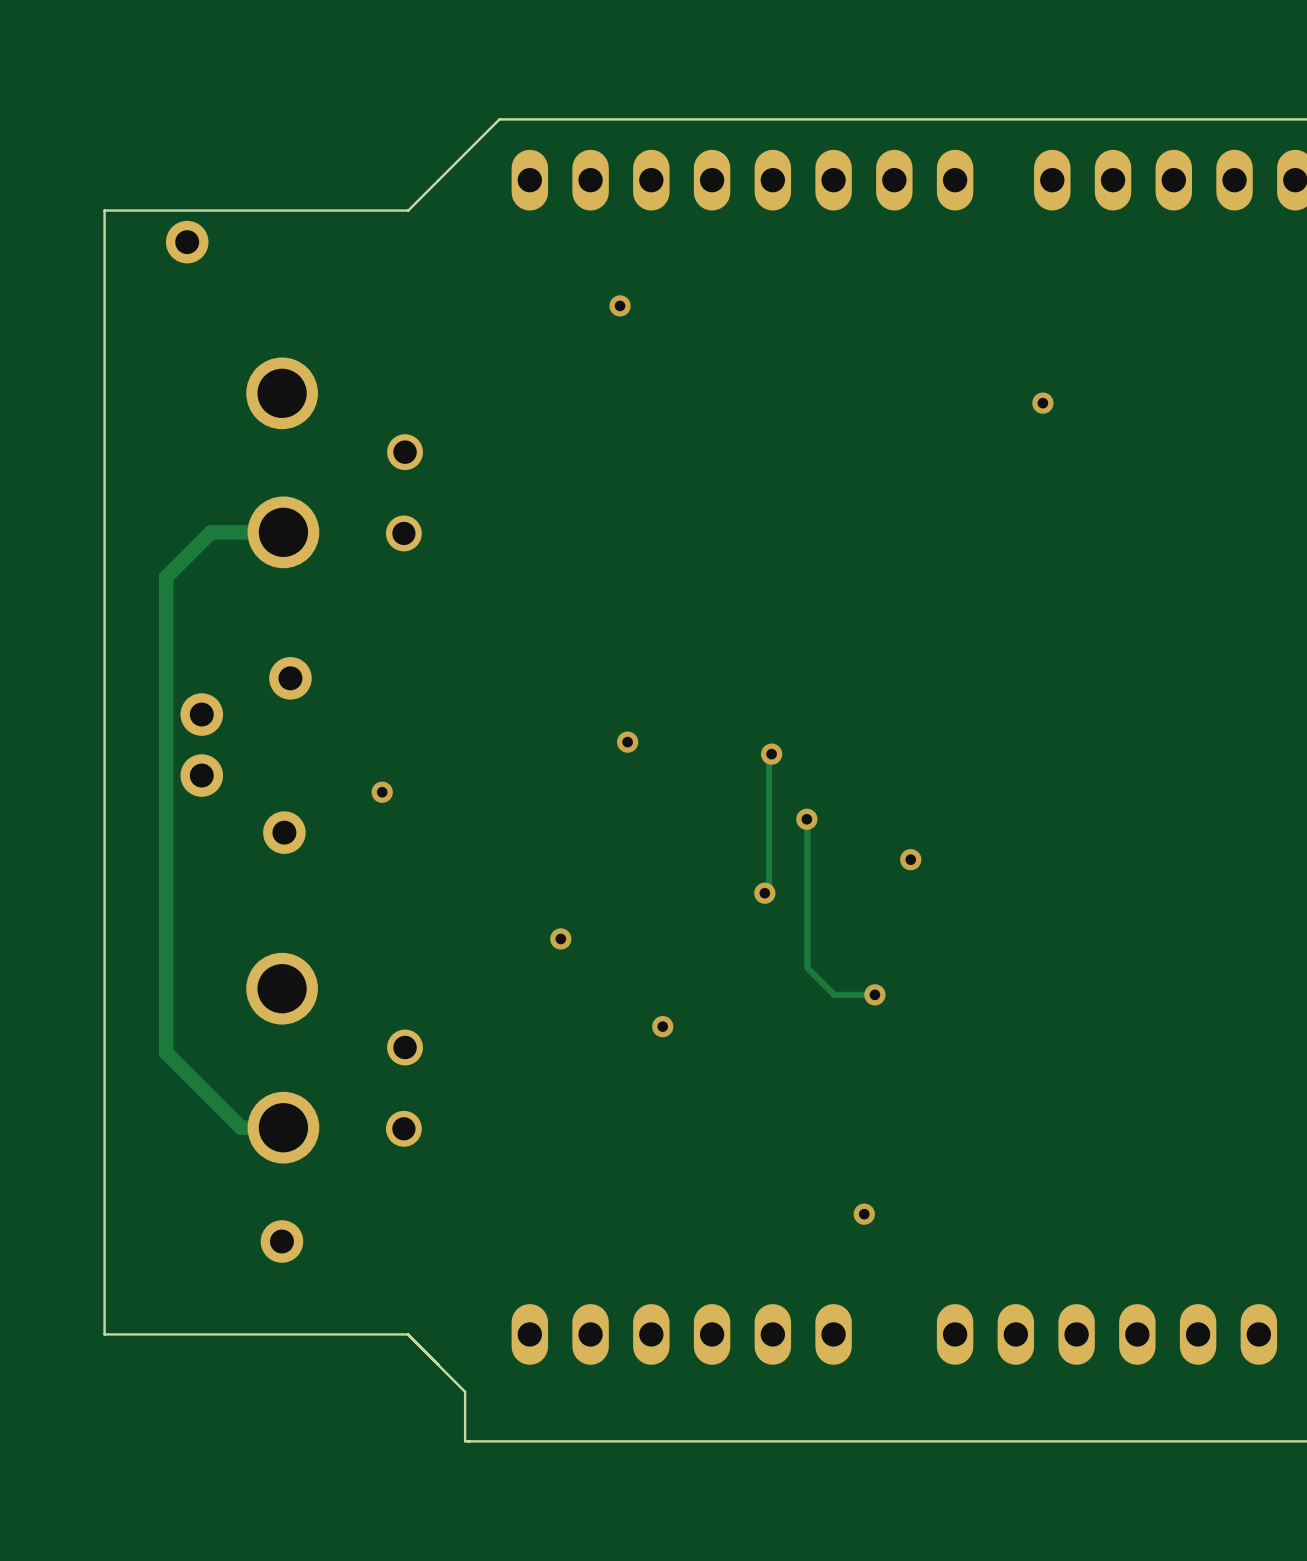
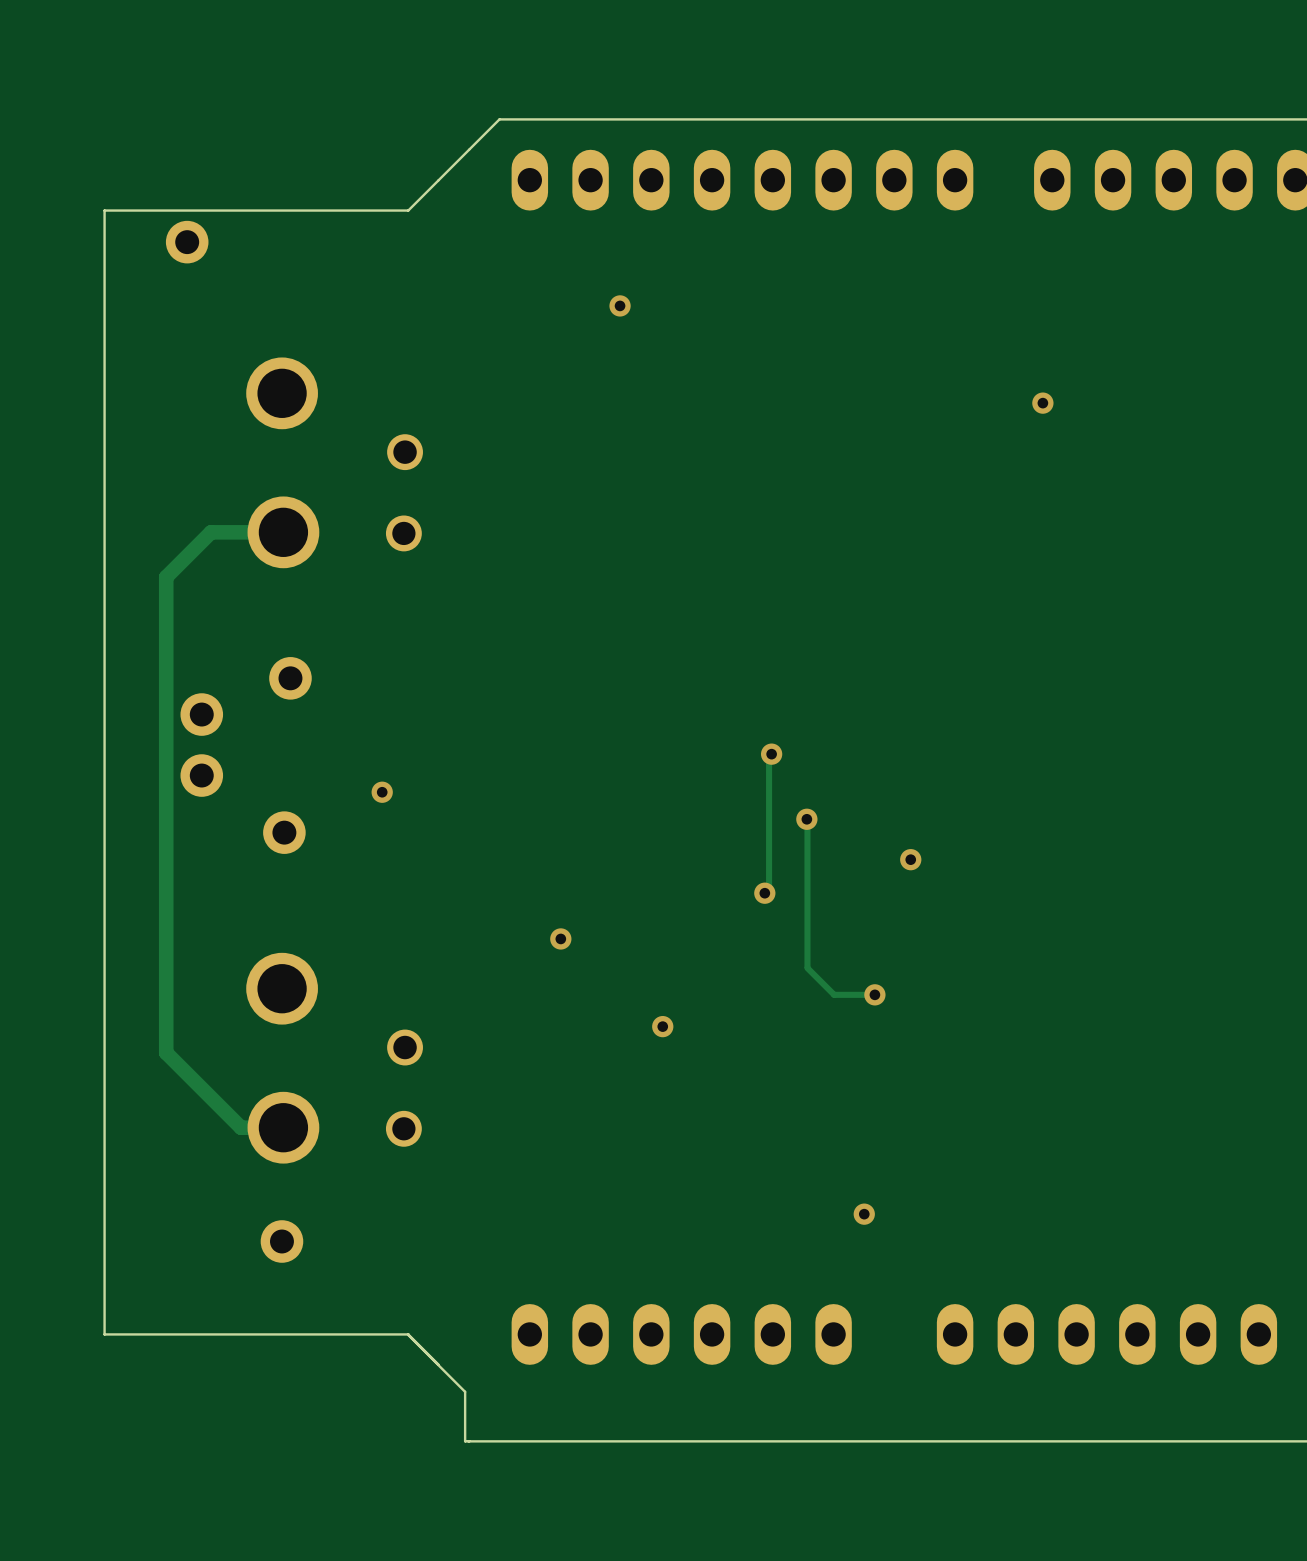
via: (627, 742) -> none

